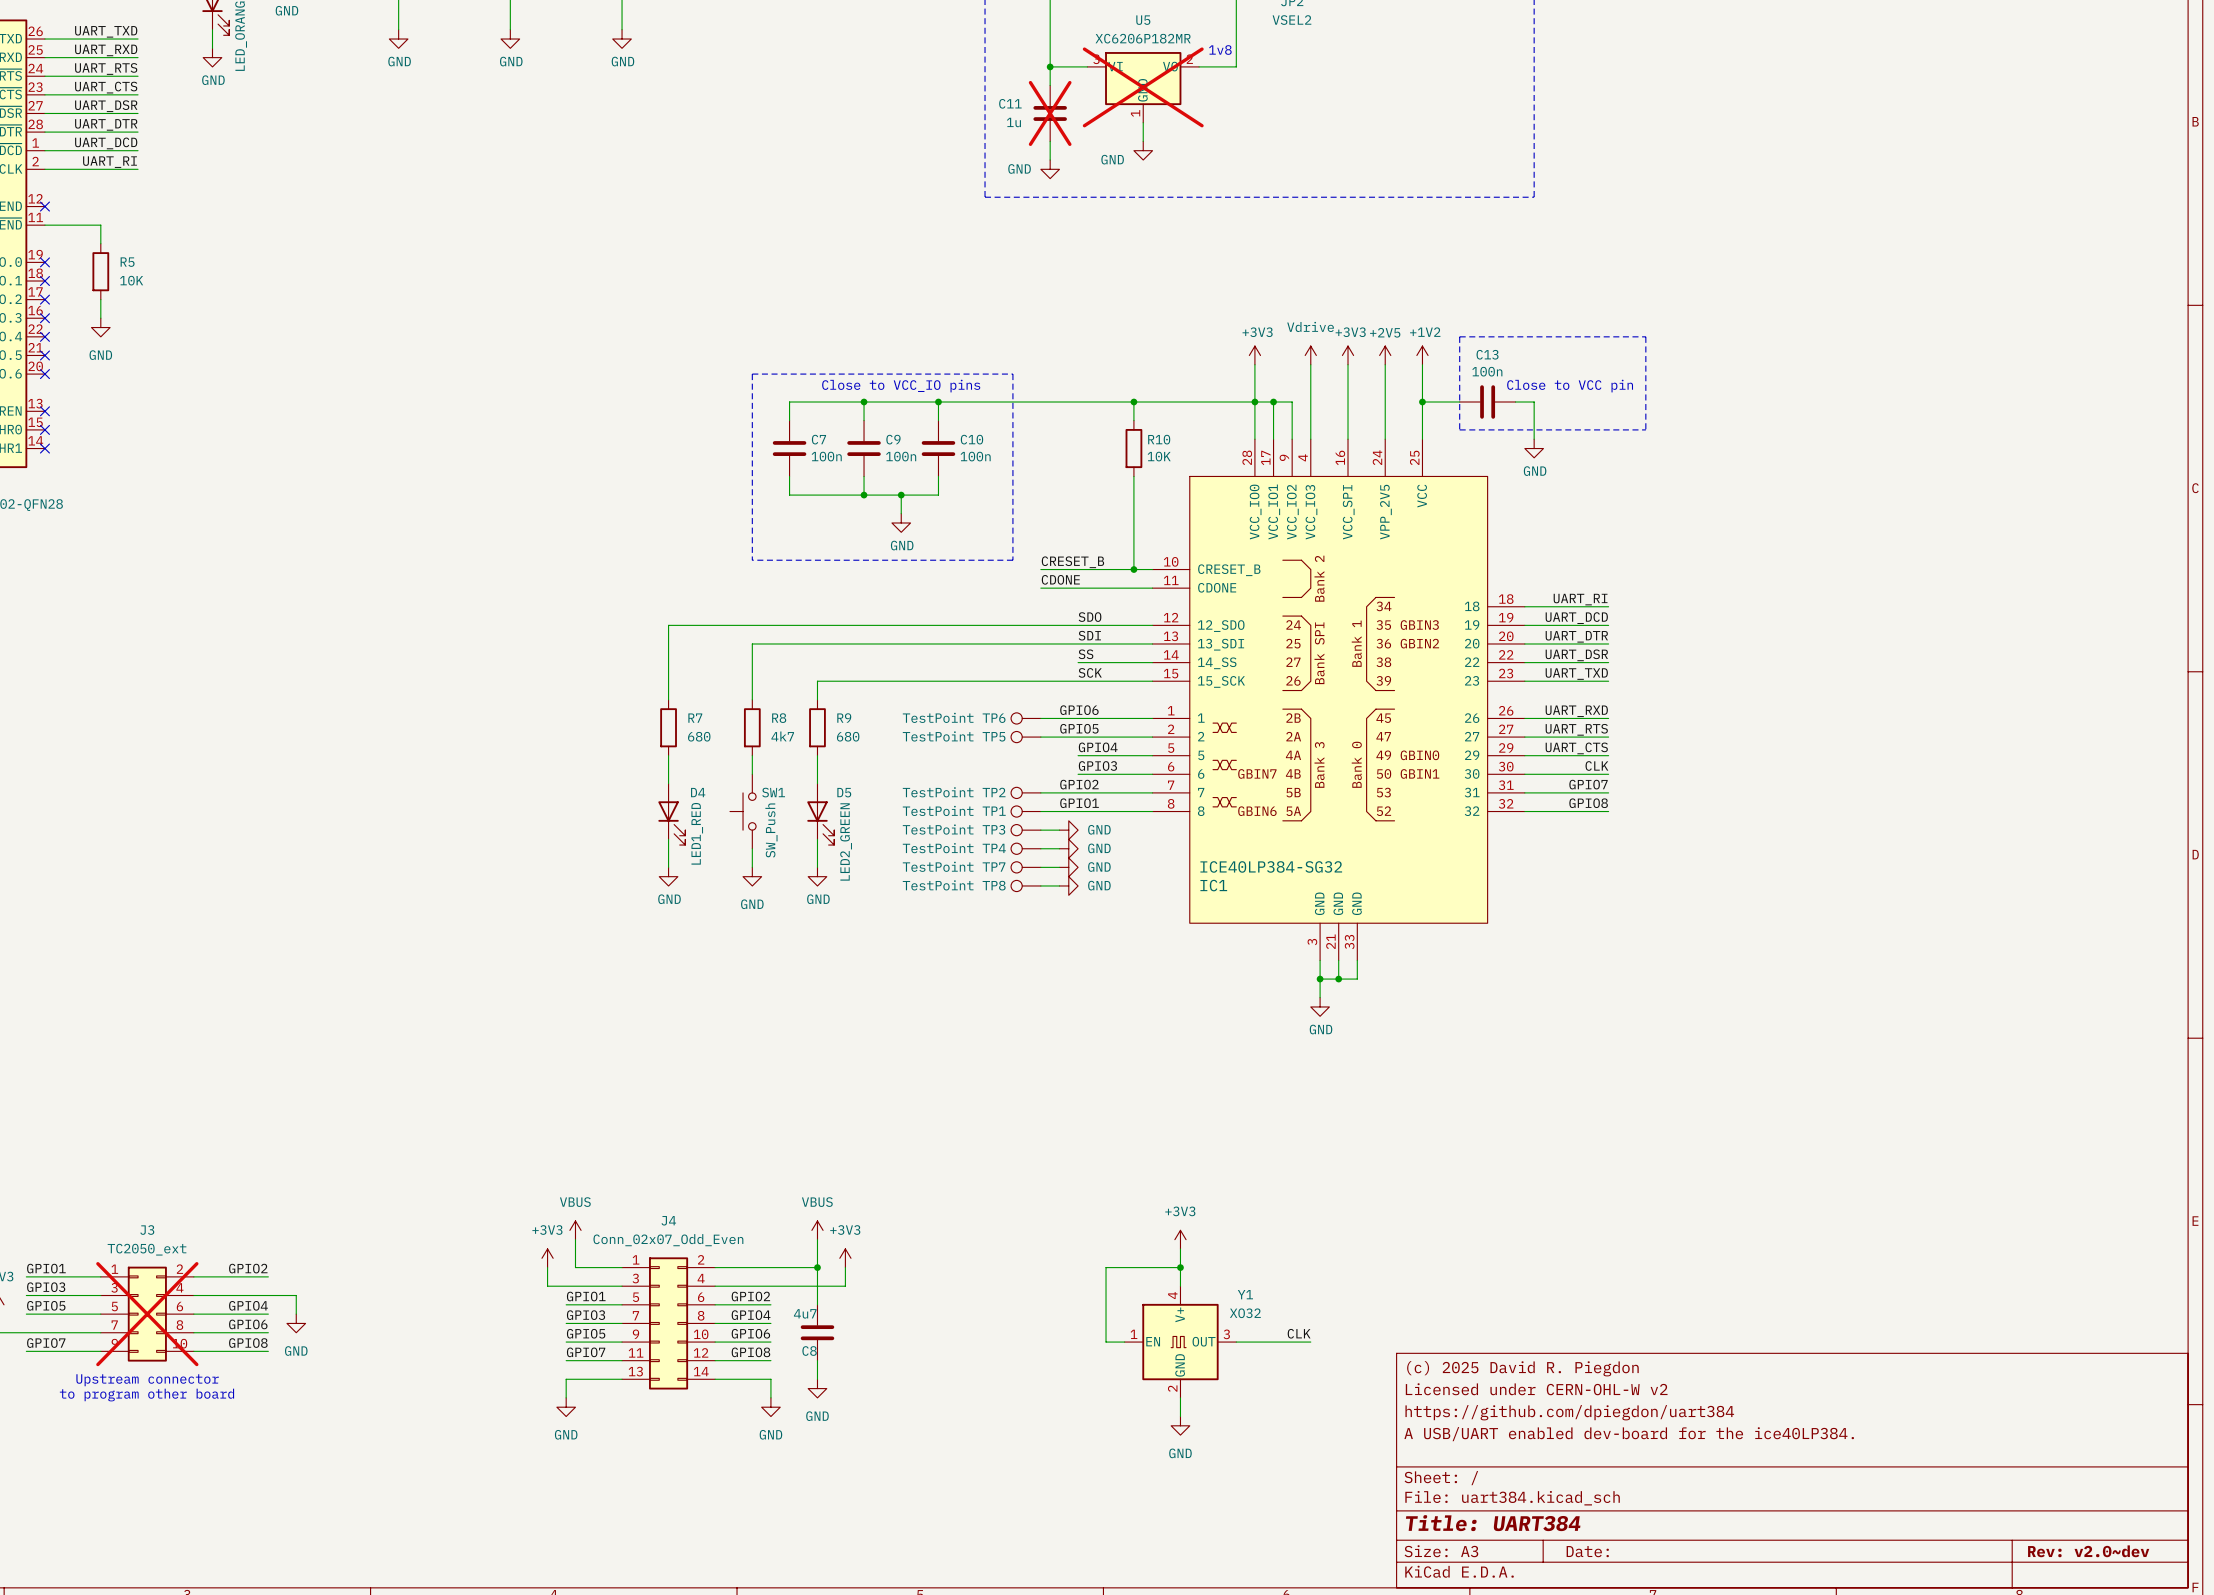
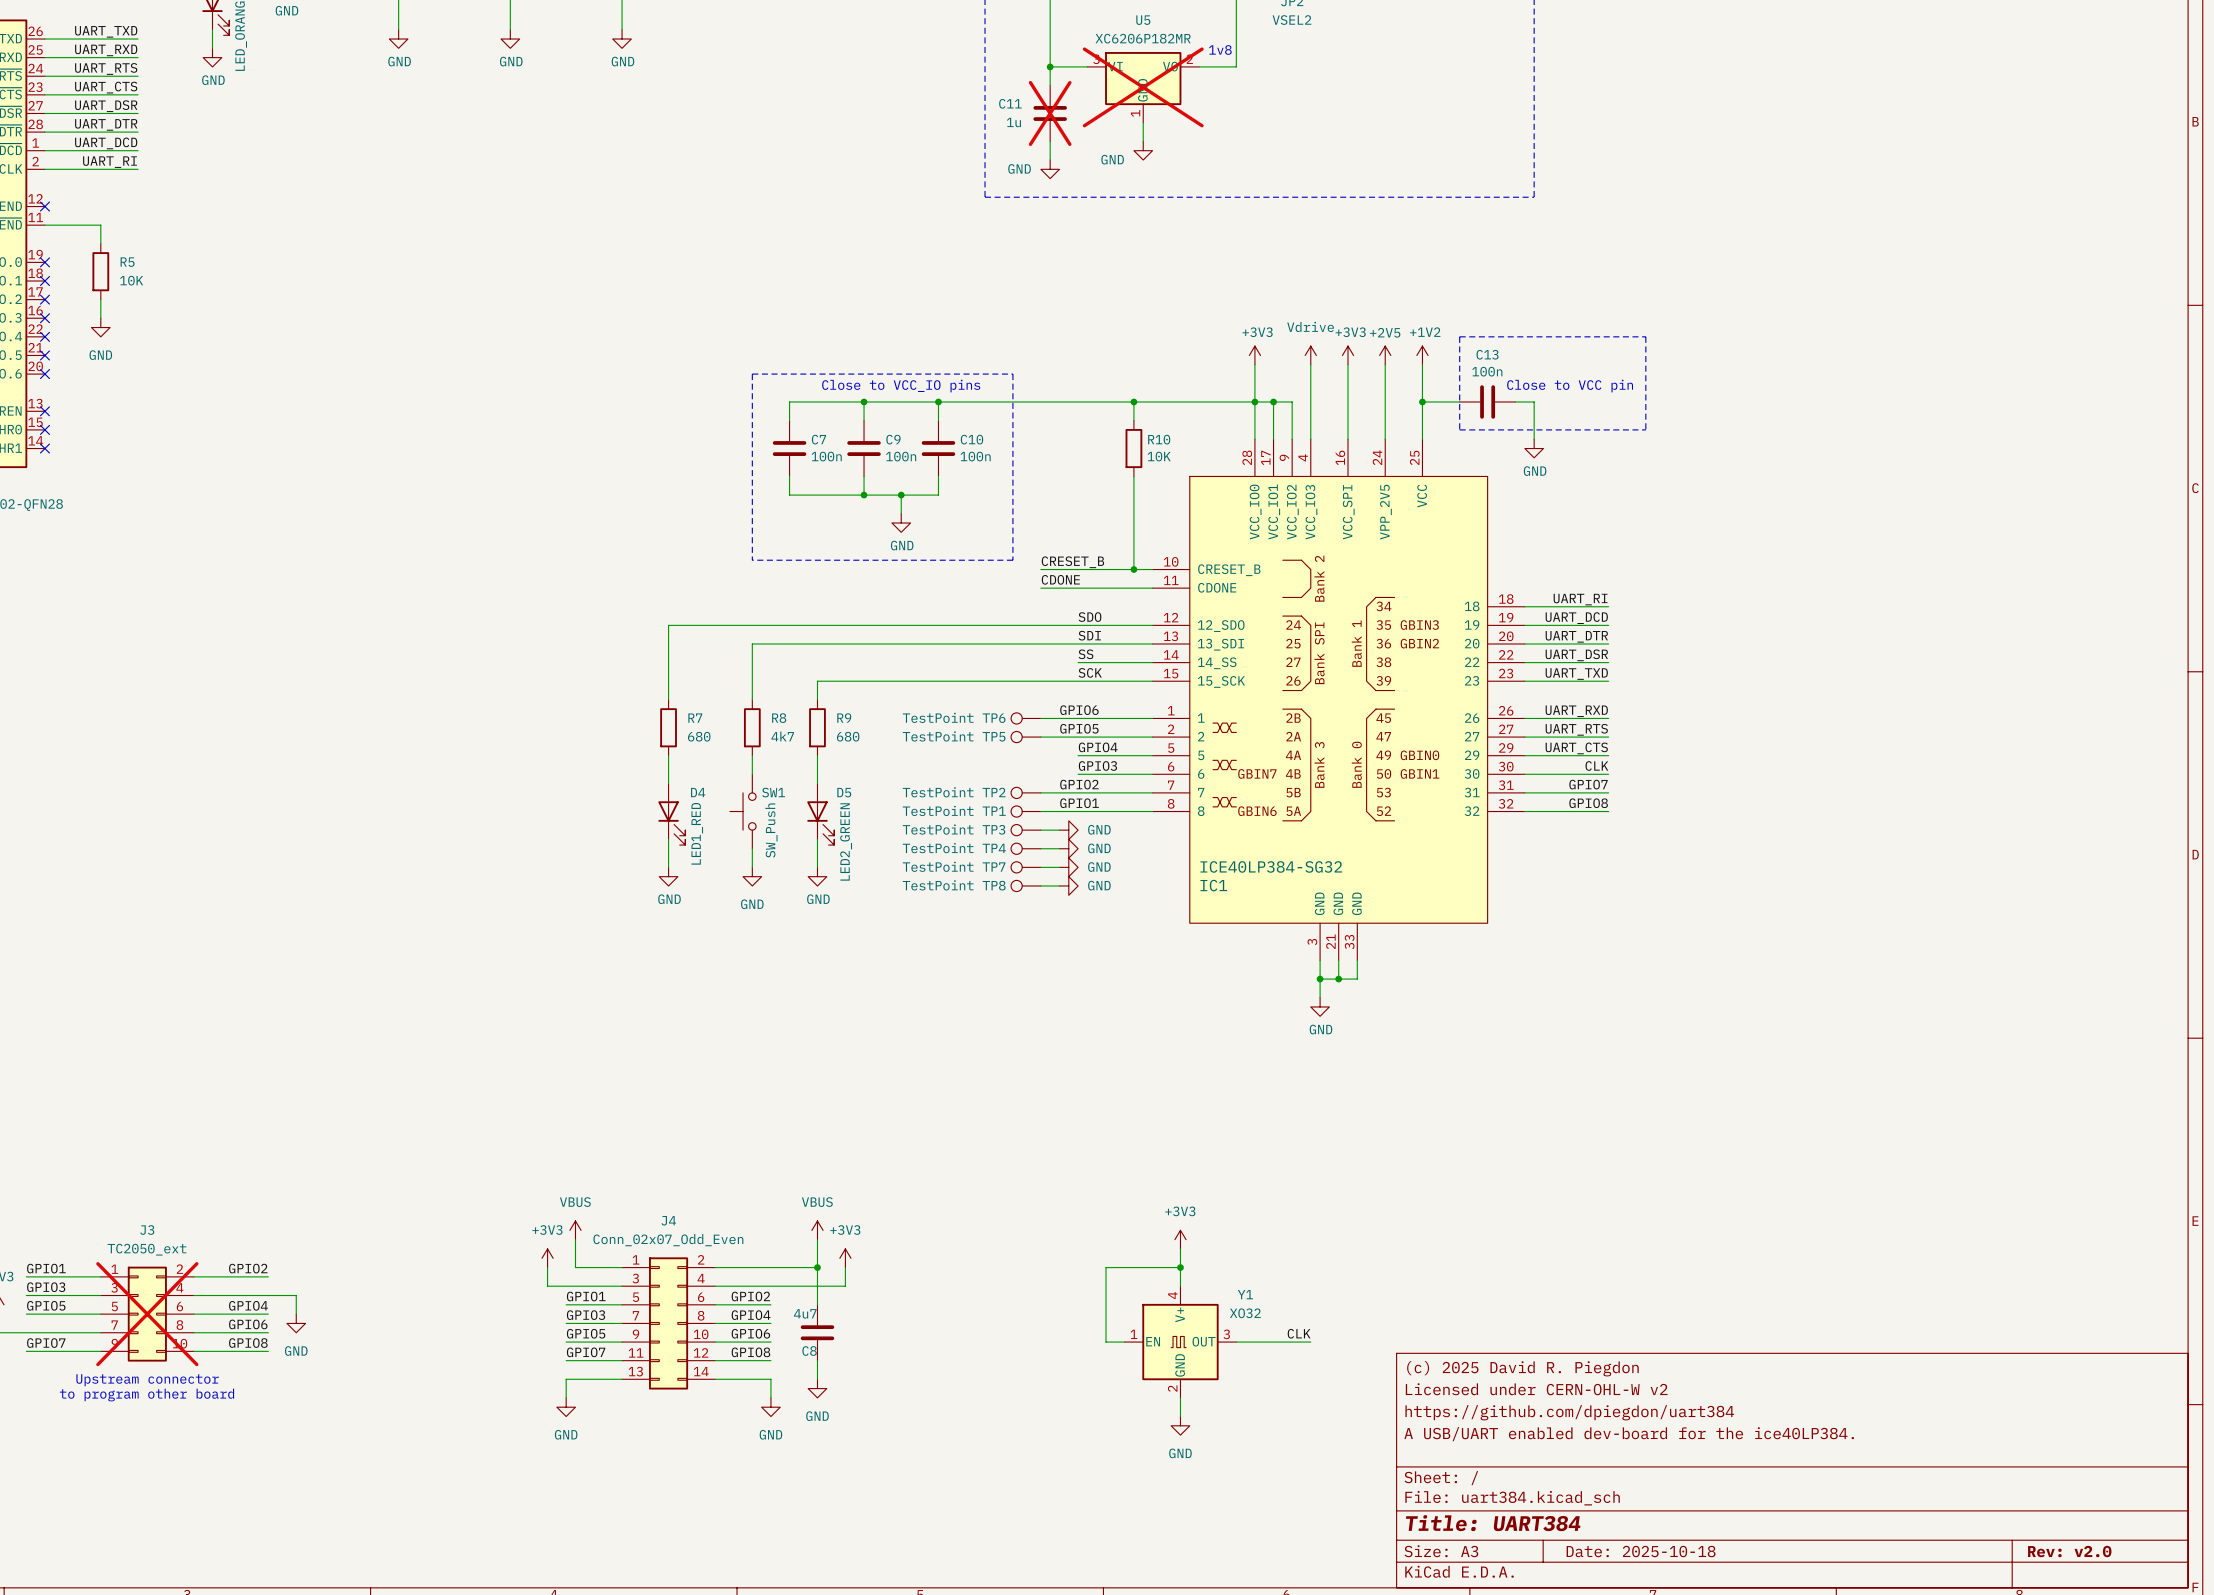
title block: Date: (1587, 1551) -> Date: 2025-10-18 (1641, 1551)
title block: Rev: v2.0~dev (2088, 1551) -> Rev: v2.0 (2069, 1551)

